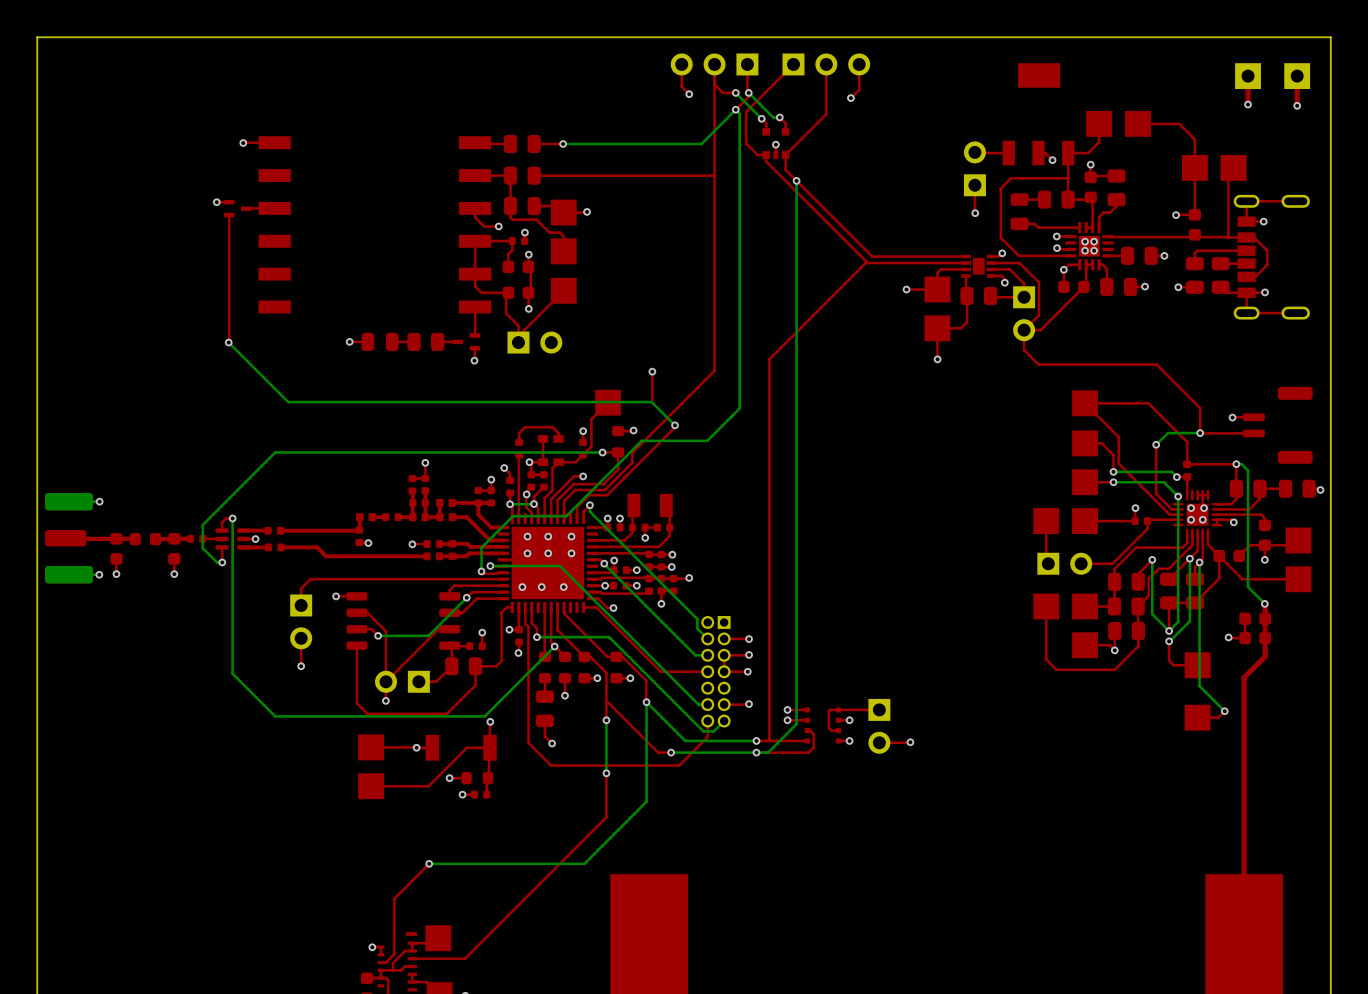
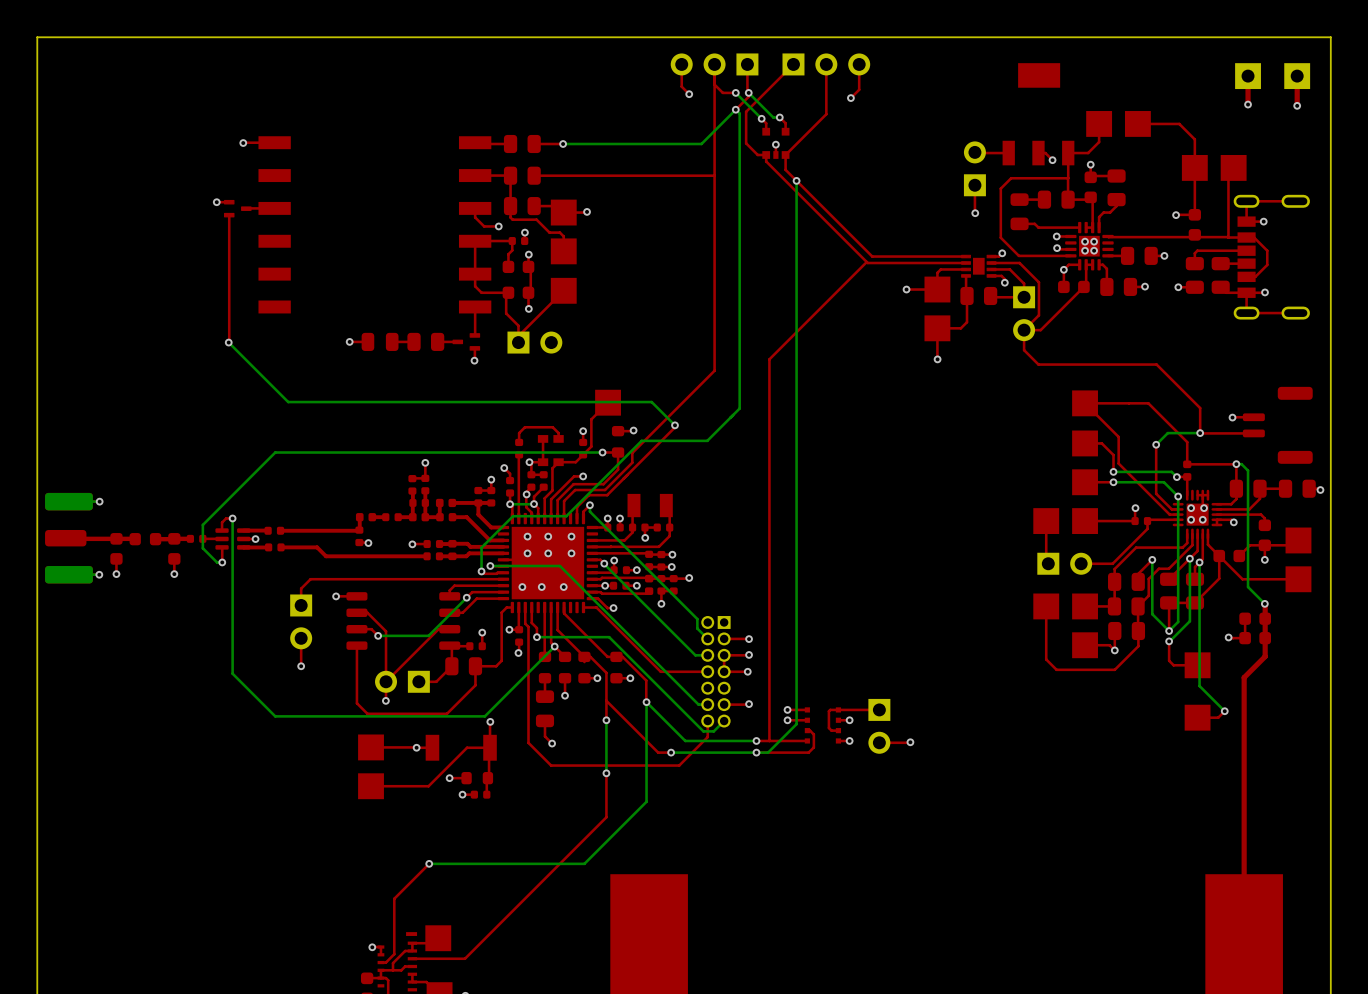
top track: (652, 371) (652, 400) -> none
via: (652, 371) -> none

